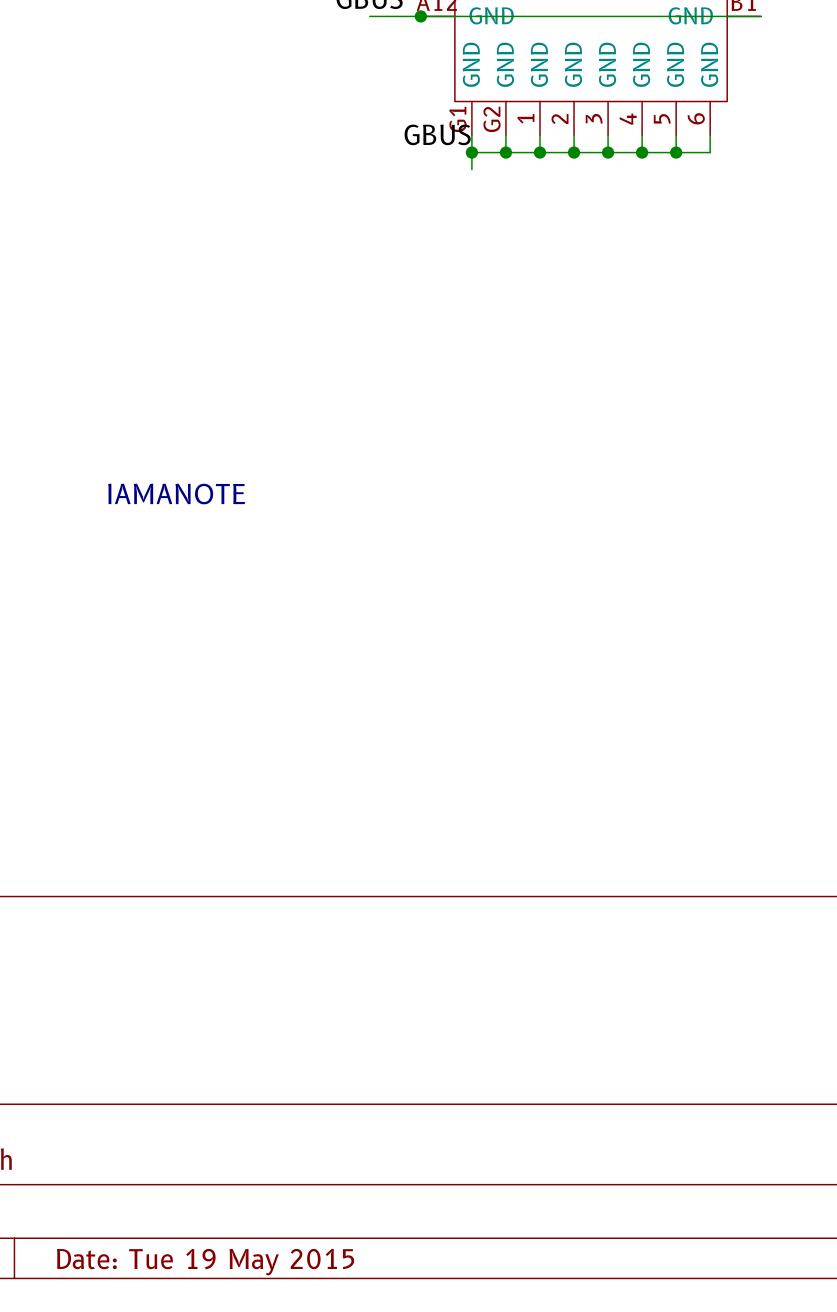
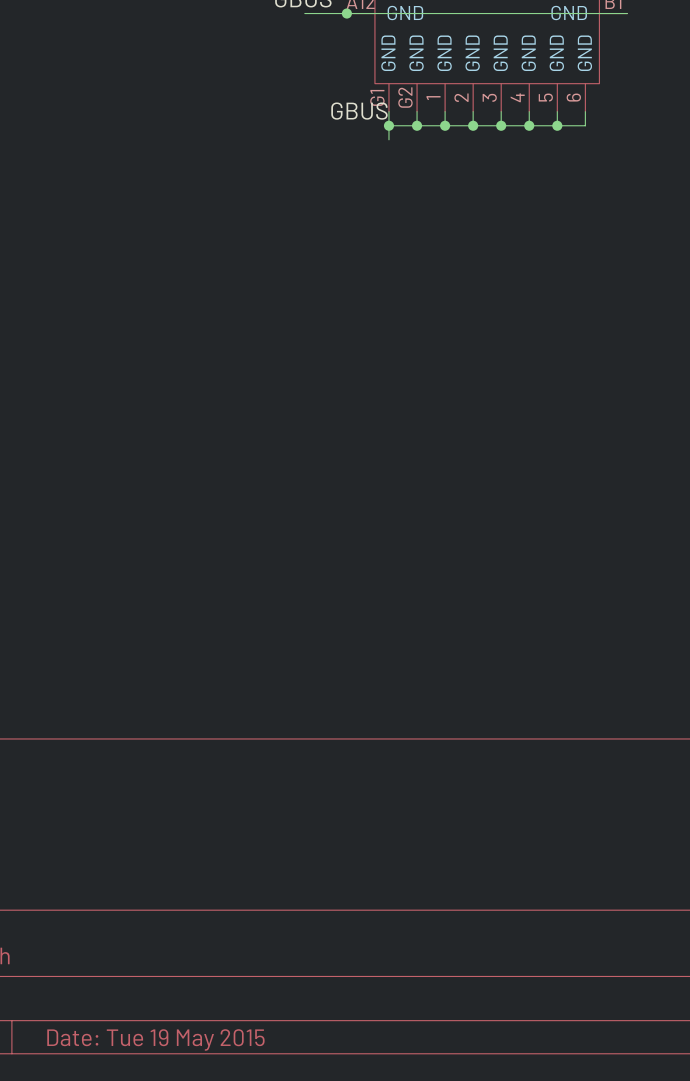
text: IAMANOTE (176, 494) -> none

